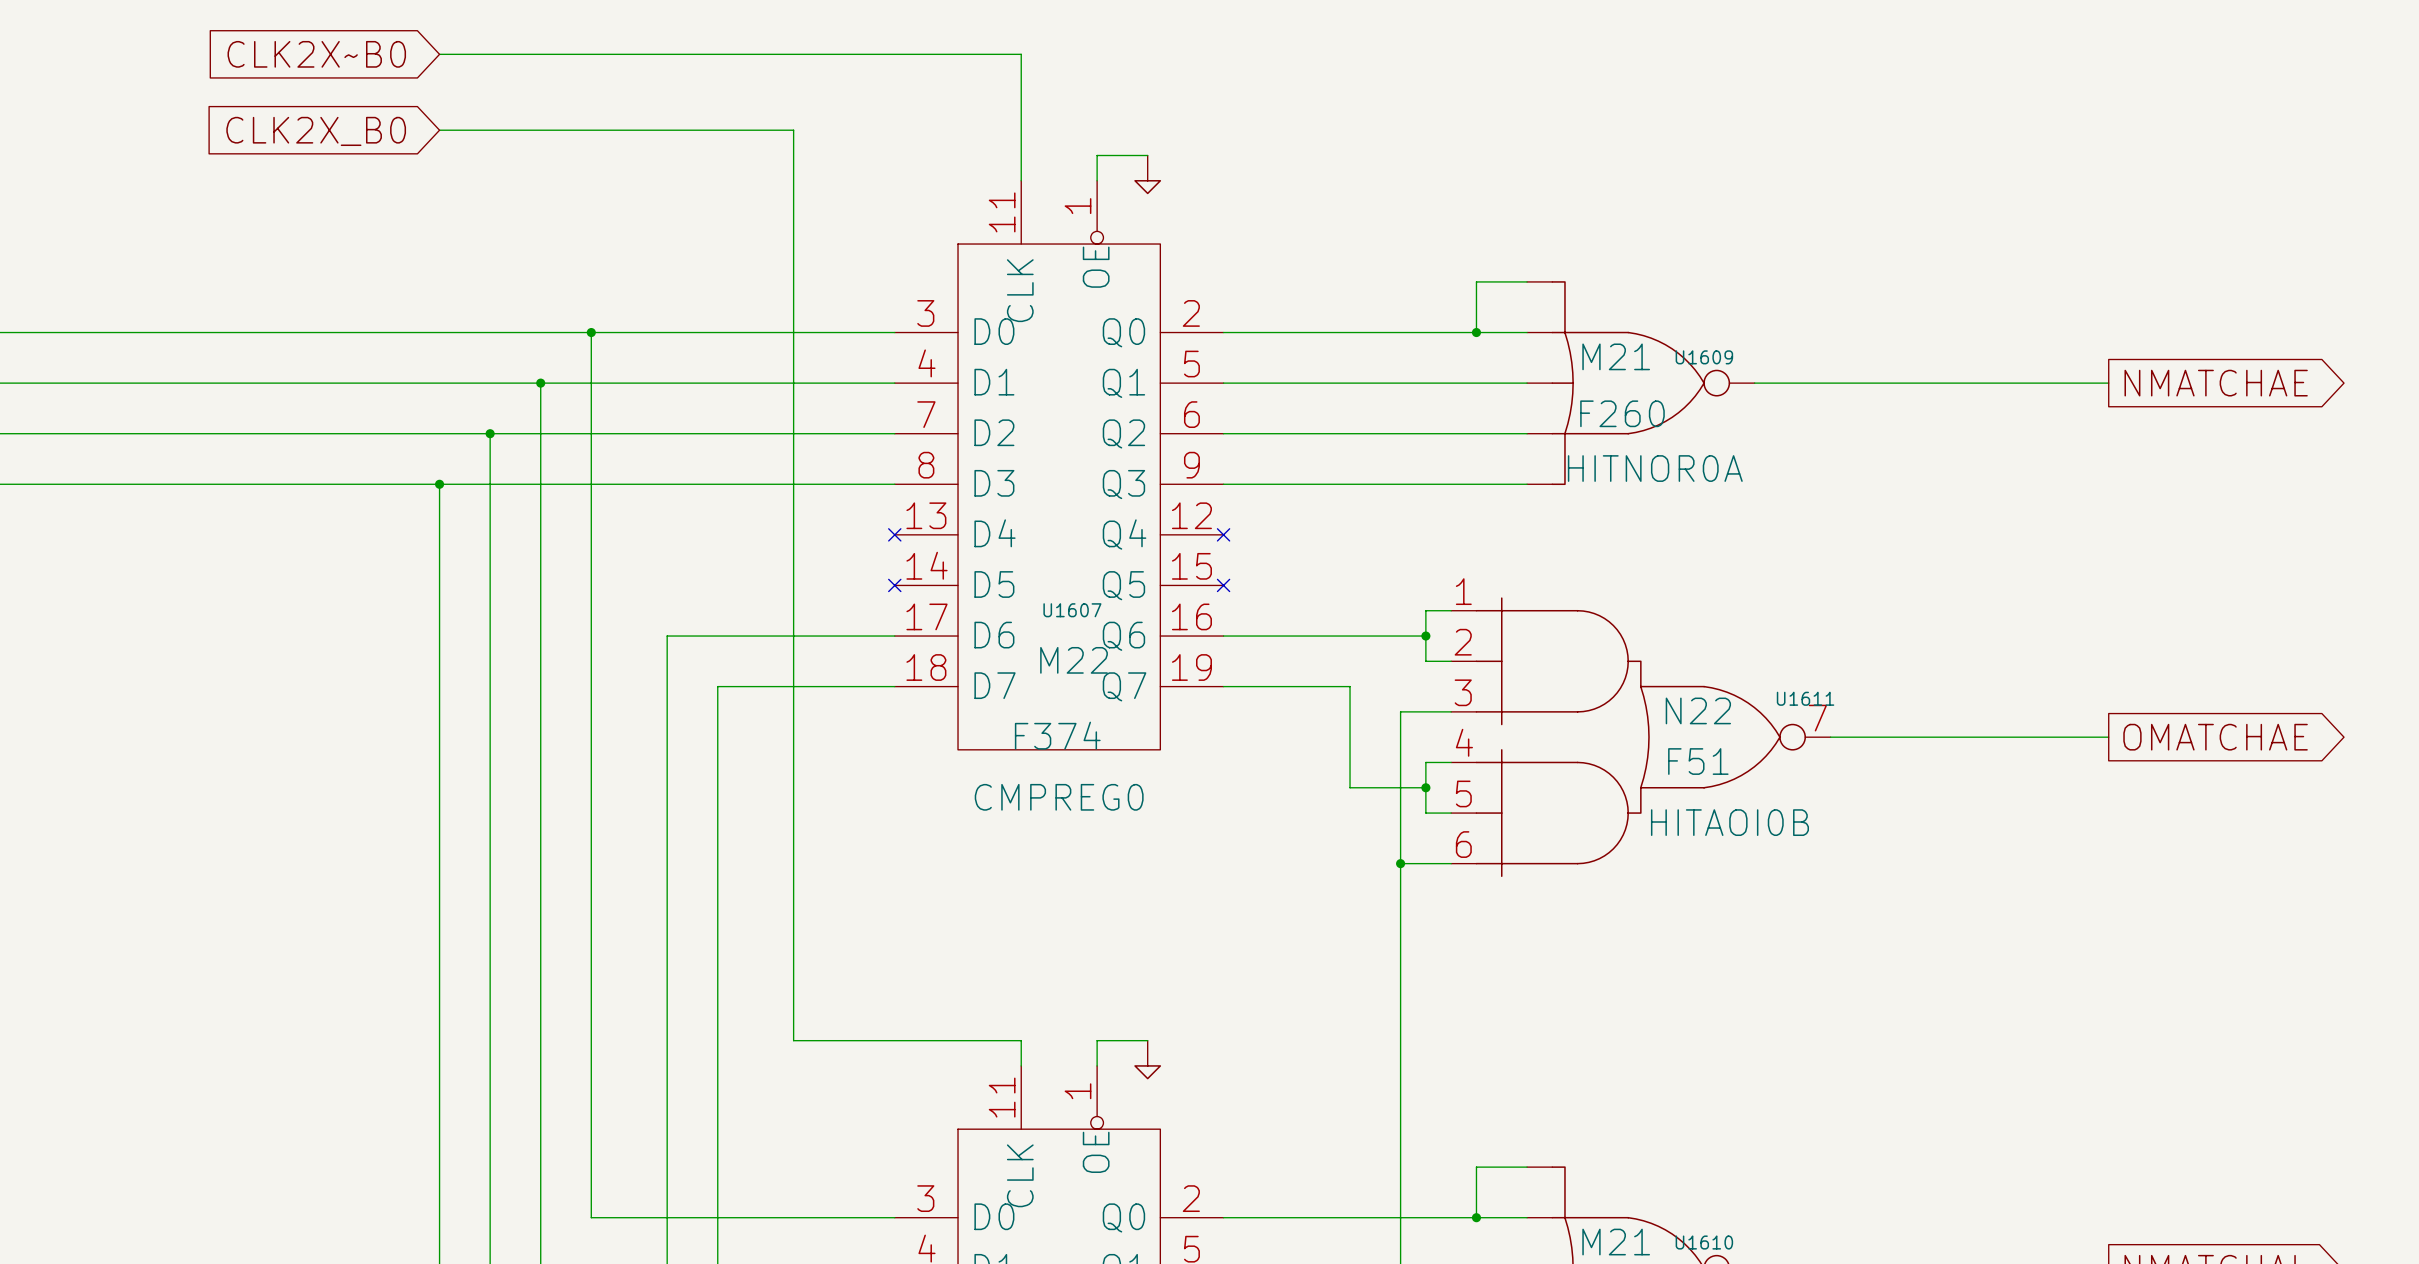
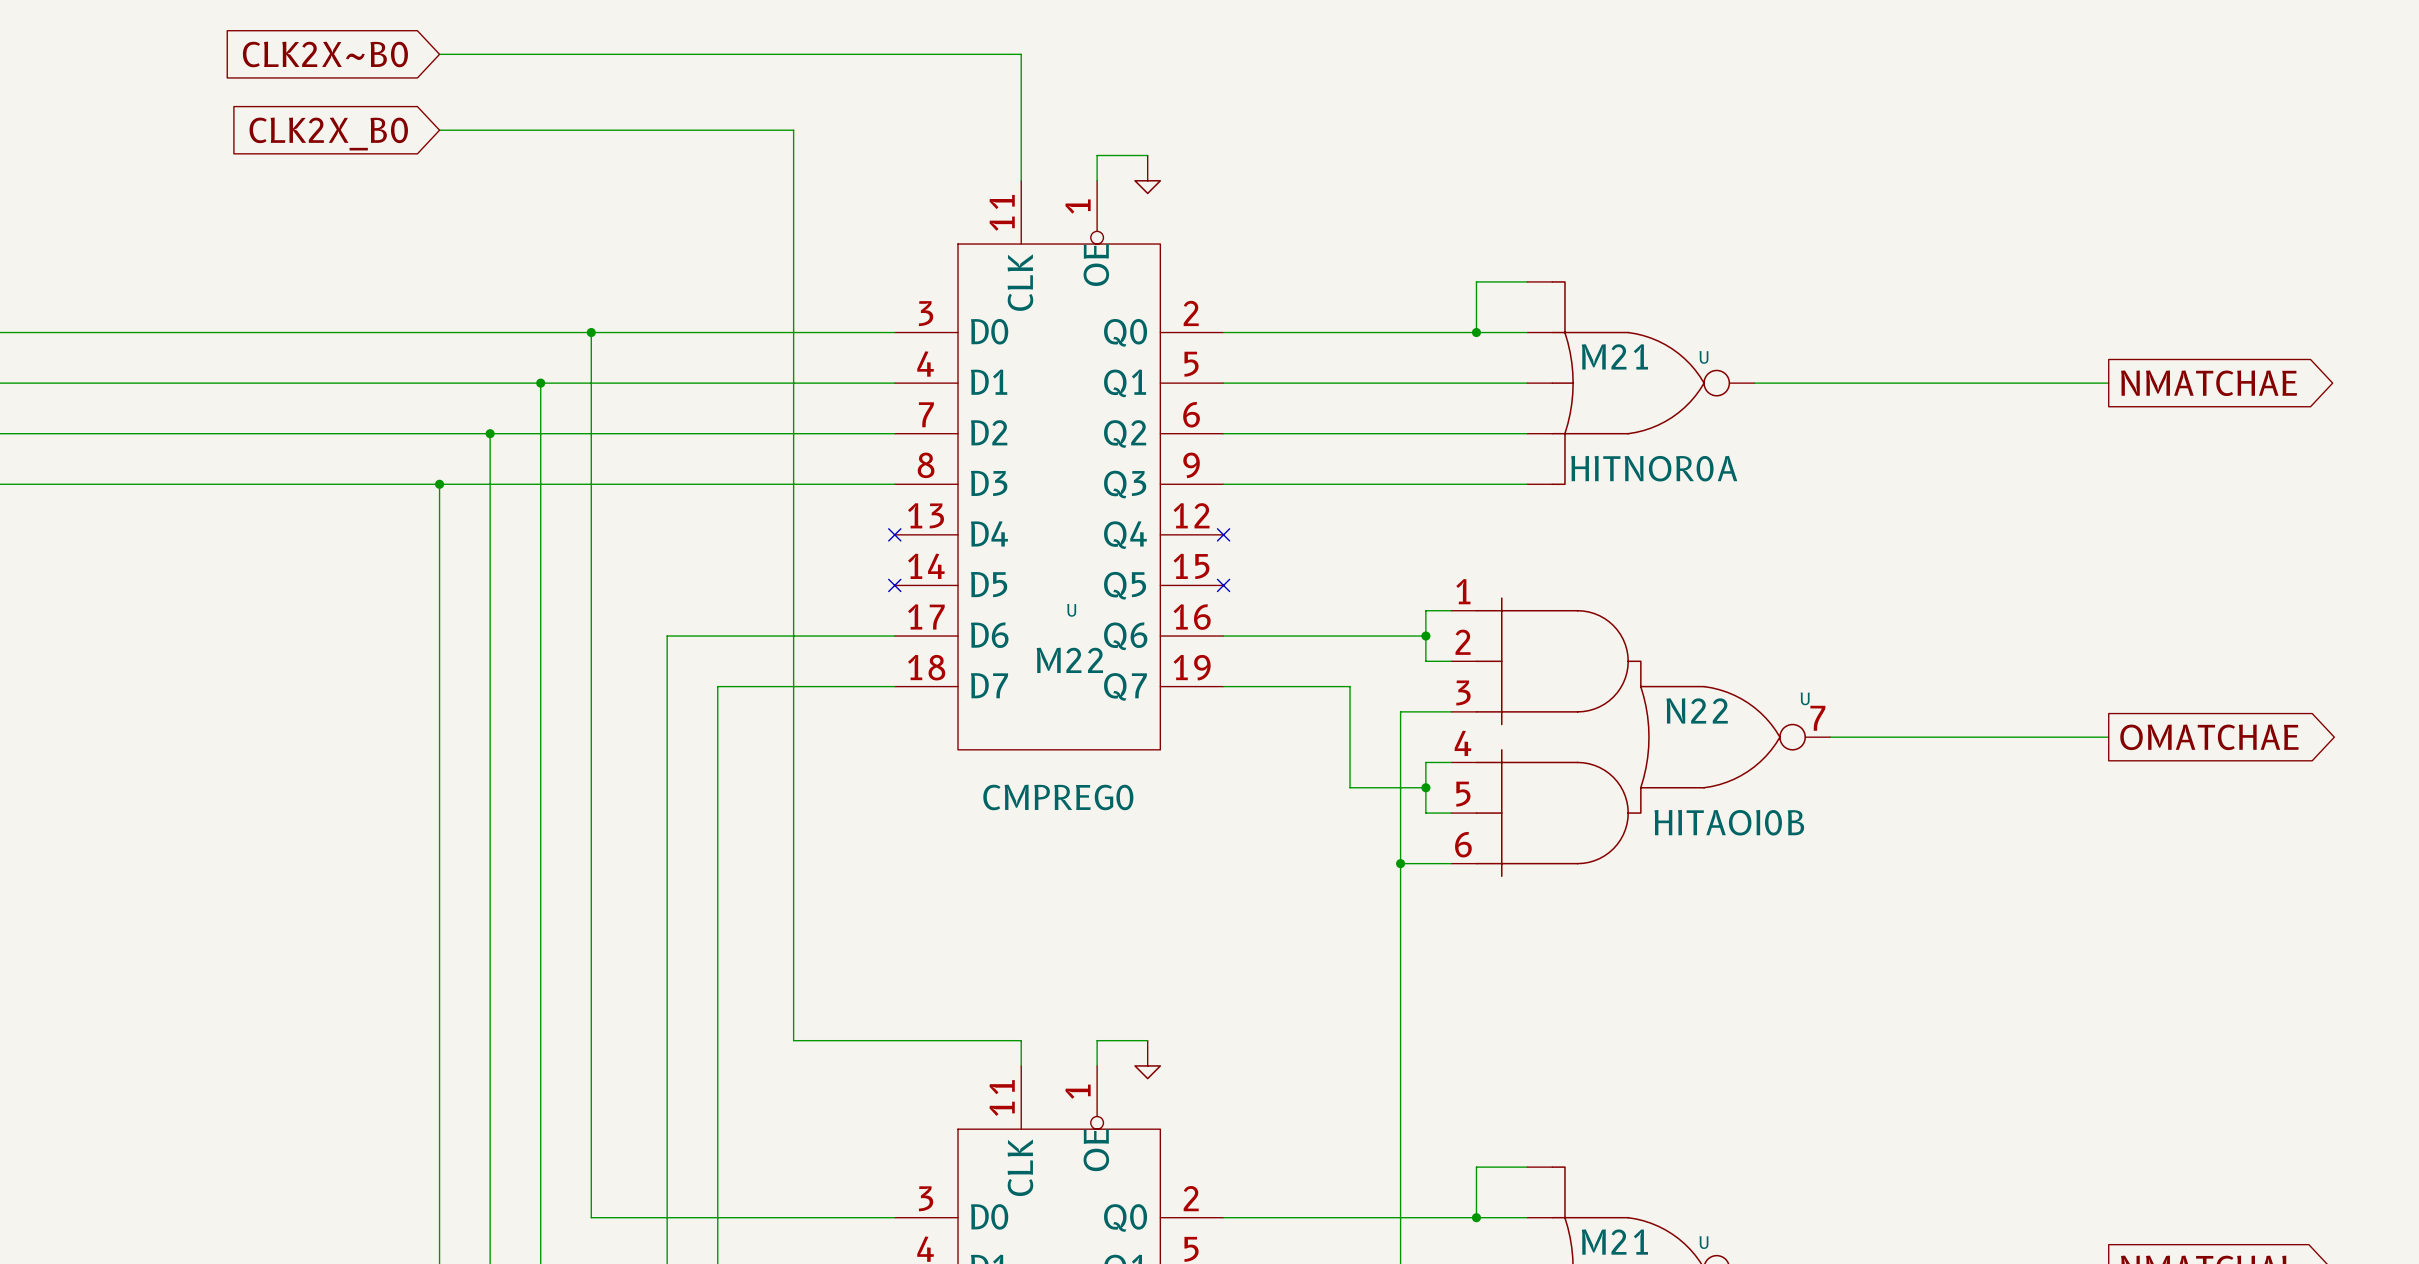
U1609 name: U1609 (1704, 357) -> U (1703, 357)
U1609 value: F260 (1622, 413) -> none
U1607 name: U1607 (1072, 610) -> U (1071, 610)
U1611 name: U1611 (1805, 698) -> U (1805, 698)
U1607 value: F374 (1057, 735) -> none
U1611 value: F51 (1698, 761) -> none
U1610 name: U1610 (1704, 1242) -> U (1703, 1242)

